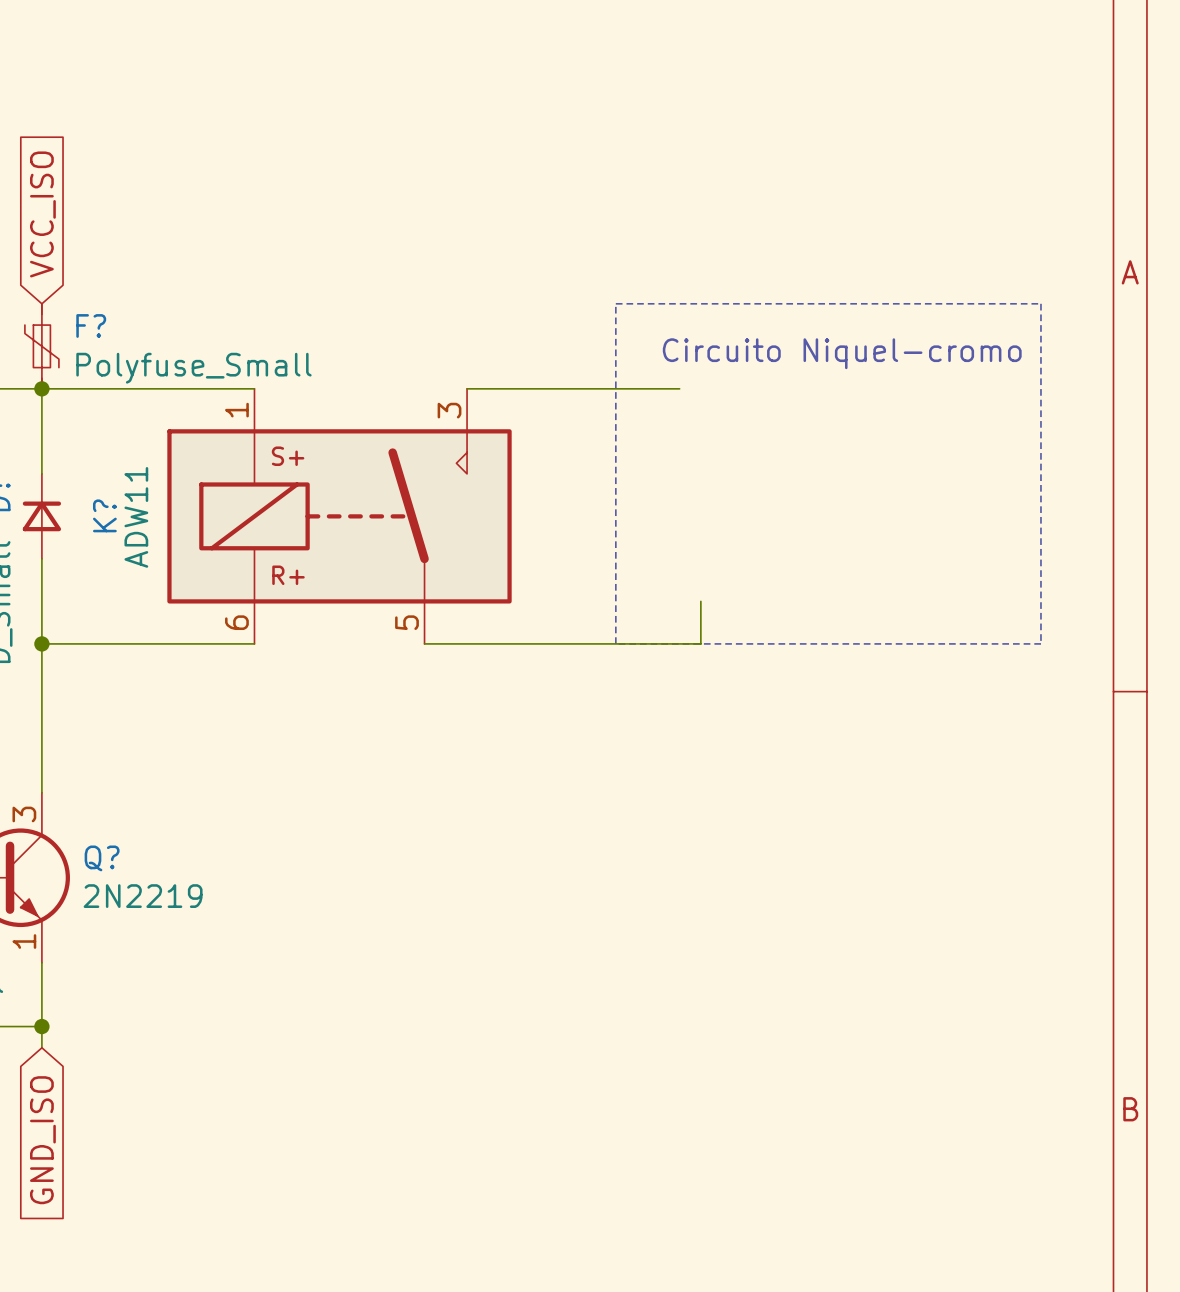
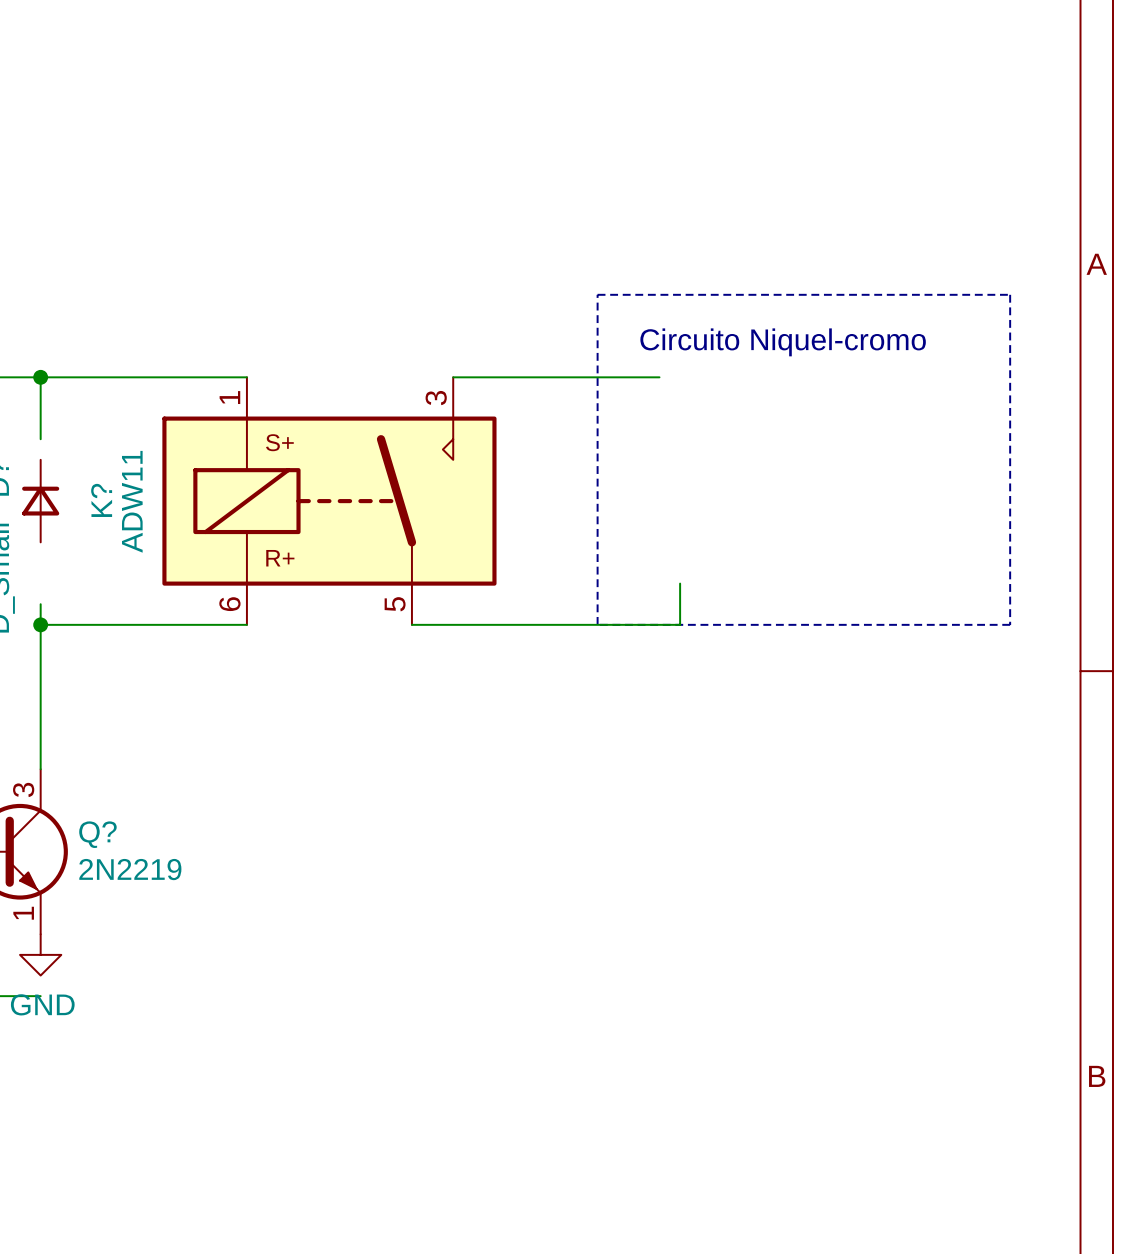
global label: VCC_ISO (42, 214) -> none
F?: Polyfuse_Small (41, 346) -> none
wire: (41, 452) (41, 473) -> none
wire: (41, 558) (41, 622) -> none
wire: (41, 962) (41, 1047) -> none
power symbol: none -> GND (40, 954)
junction: (41, 1026) -> none
global label: GND_ISO (42, 1140) -> none

